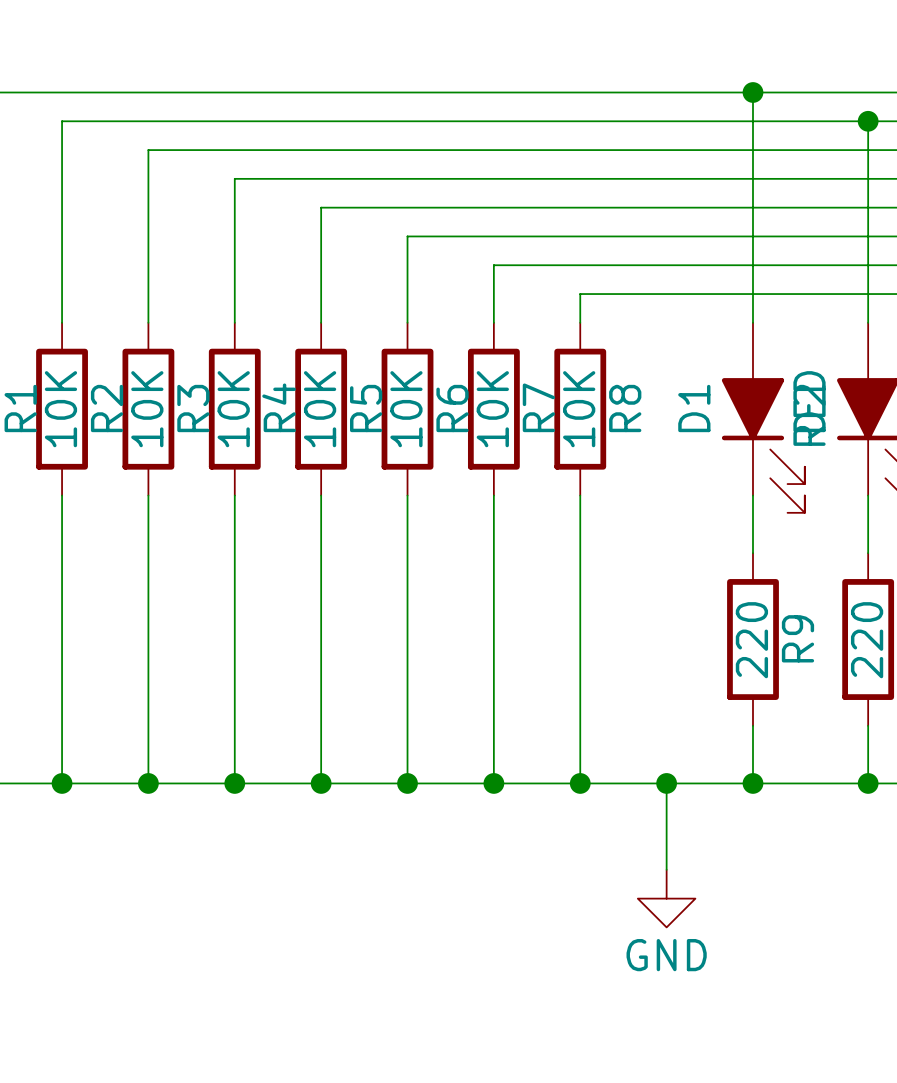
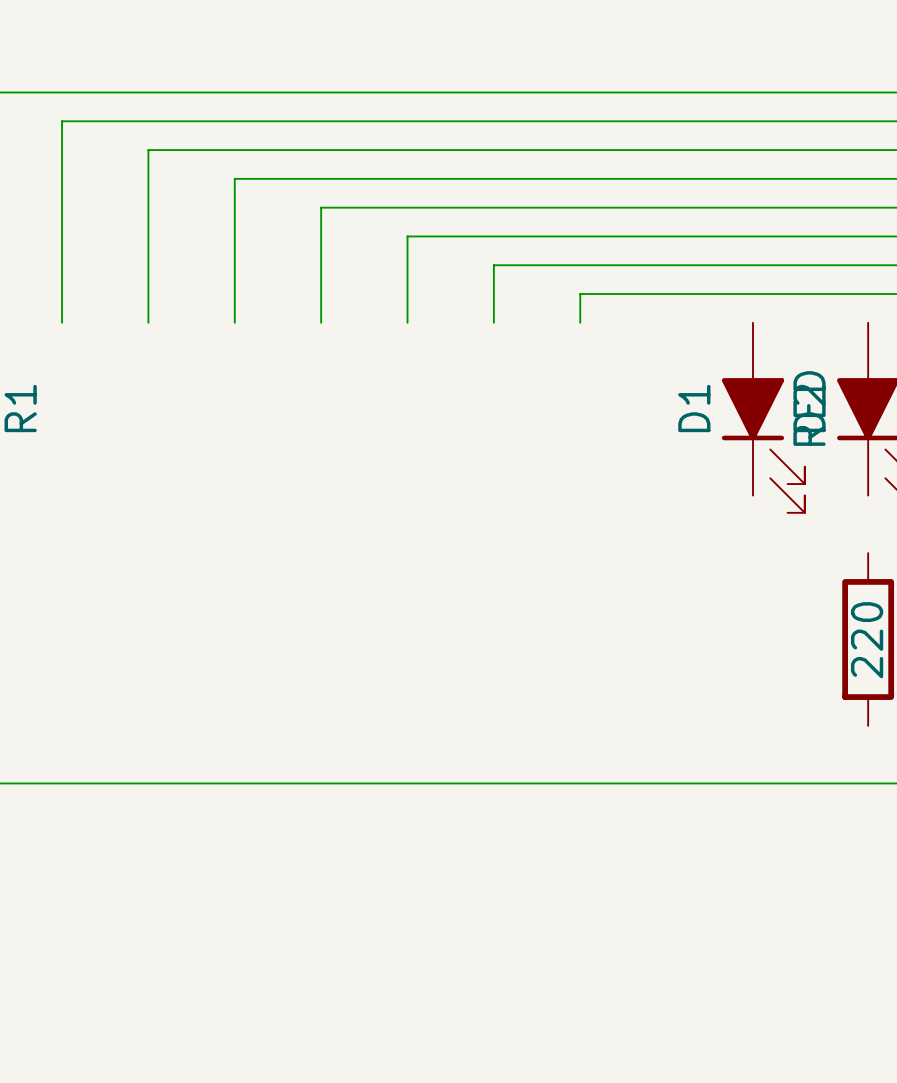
wire: (752, 92) (752, 322) -> none
junction: (752, 92) -> none
wire: (868, 121) (868, 322) -> none
junction: (868, 121) -> none
R2: 10K (62, 409) -> none
R3: 10K (148, 409) -> none
R4: 10K (234, 409) -> none
R5: 10K (321, 409) -> none
R6: 10K (407, 409) -> none
R7: 10K (493, 409) -> none
R8: 10K (580, 409) -> none
wire: (62, 495) (62, 783) -> none
wire: (148, 495) (148, 783) -> none
wire: (234, 495) (234, 783) -> none
wire: (321, 495) (321, 783) -> none
wire: (407, 495) (407, 783) -> none
wire: (493, 495) (493, 783) -> none
wire: (580, 495) (580, 783) -> none
wire: (752, 495) (752, 553) -> none
wire: (868, 495) (868, 553) -> none
R9: 220 (752, 639) -> none
wire: (752, 725) (752, 783) -> none
wire: (868, 725) (868, 783) -> none
junction: (62, 783) -> none
junction: (148, 783) -> none
junction: (234, 783) -> none
junction: (321, 783) -> none
junction: (407, 783) -> none
junction: (493, 783) -> none
junction: (580, 783) -> none
wire: (666, 783) (666, 869) -> none
junction: (666, 783) -> none
junction: (752, 783) -> none
junction: (868, 783) -> none
power symbol: GND (666, 898) -> none

